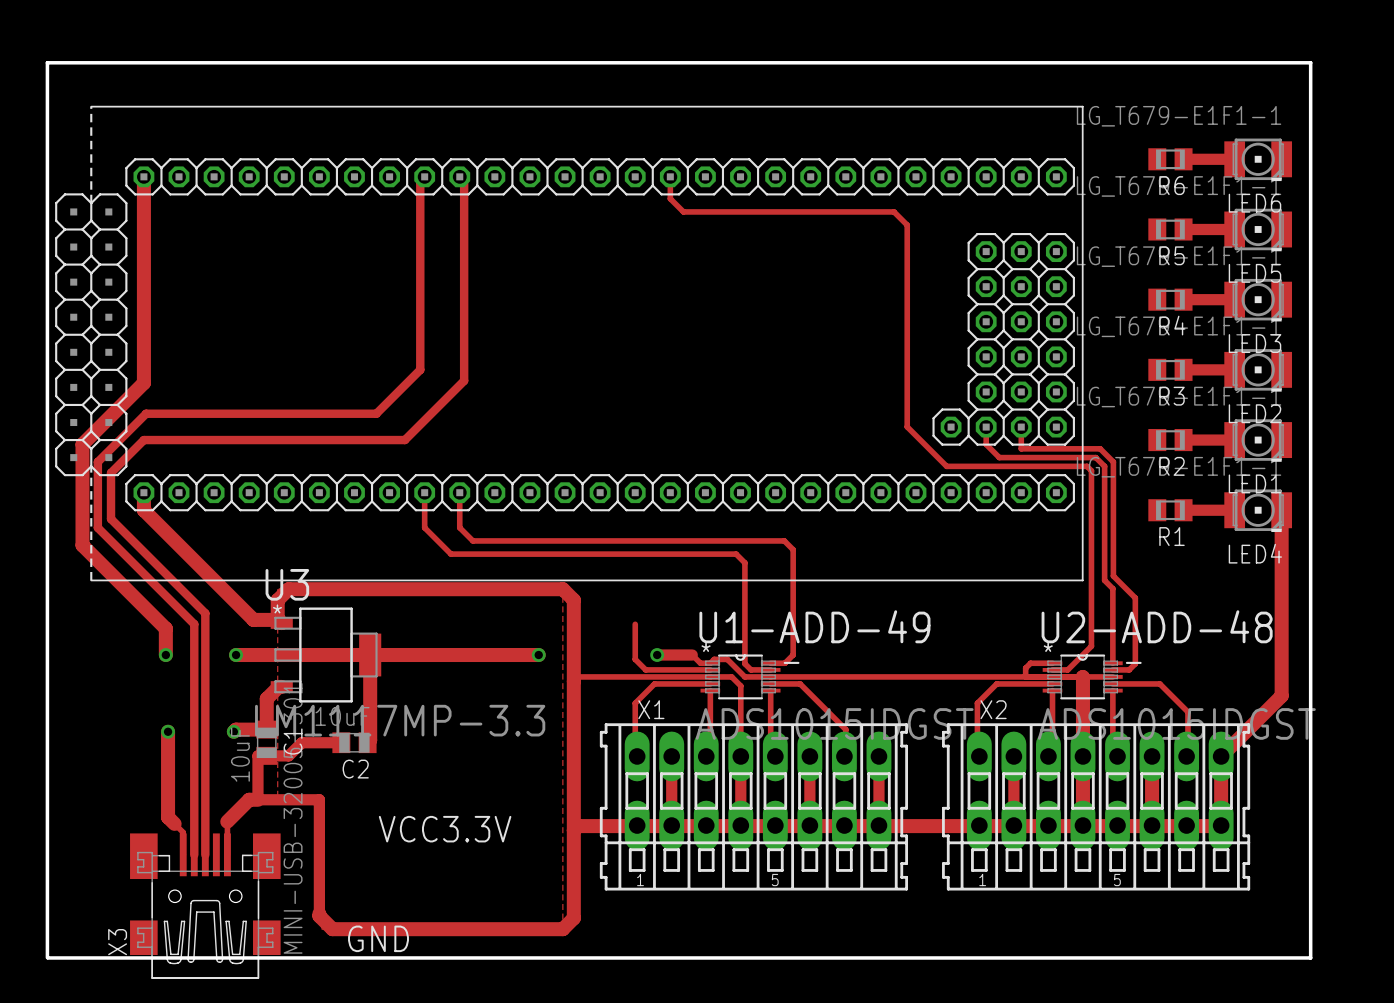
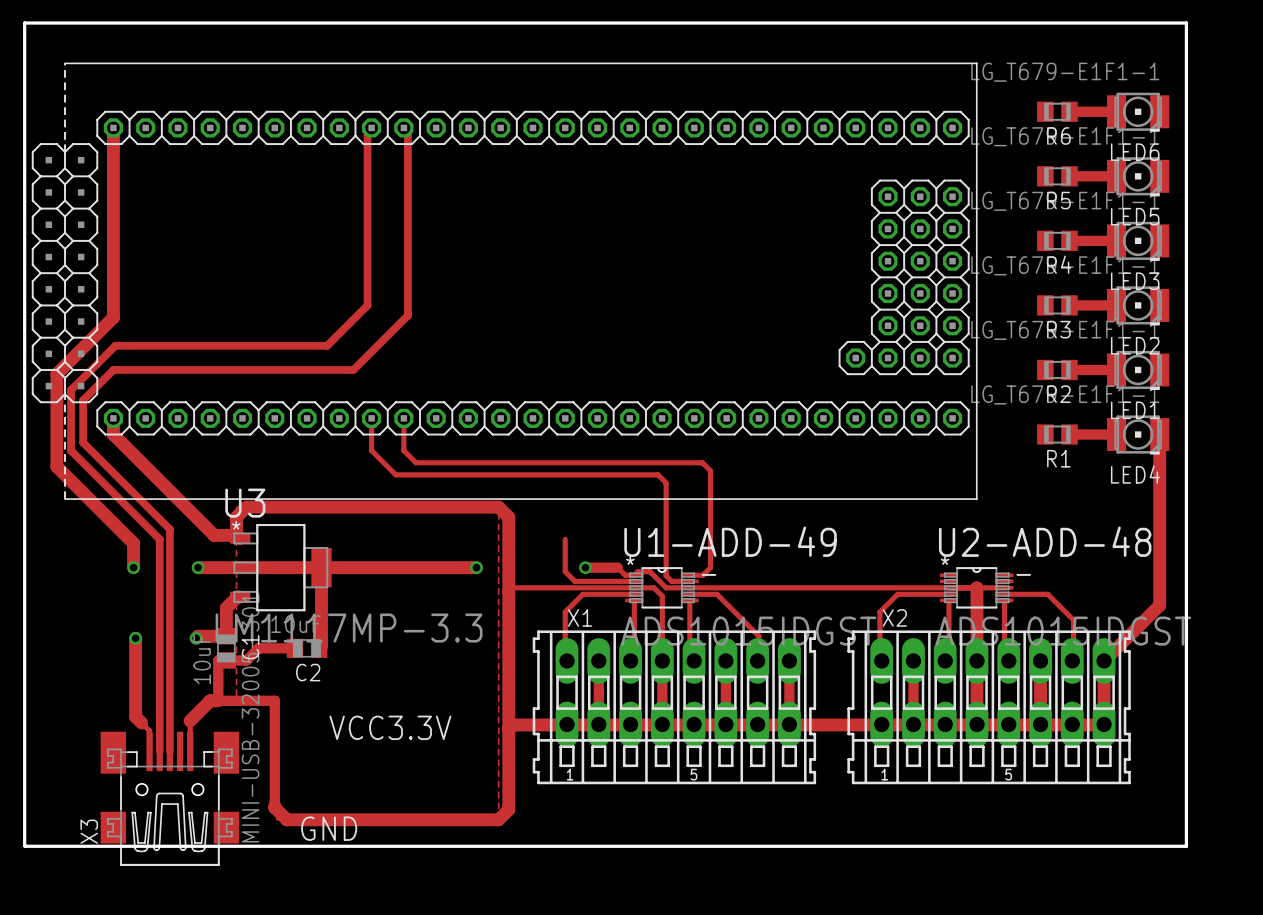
track: (670, 176) (670, 198) (683, 211) (894, 211) (907, 225) (907, 426) (946, 466) (1087, 466) (1091, 470) (1091, 646) (1067, 669) (1052, 669) -> none
track: (986, 427) (986, 444) (999, 457) (1095, 457) (1104, 466) (1104, 580) (1112, 588) (1112, 663) -> none
track: (1021, 427) (1021, 448) (1100, 448) (1113, 461) (1113, 576) (1135, 597) (1135, 663) (1129, 669) (1112, 669) -> none
track: (1052, 663) (1030, 663) (1025, 668) (1025, 676) -> none

